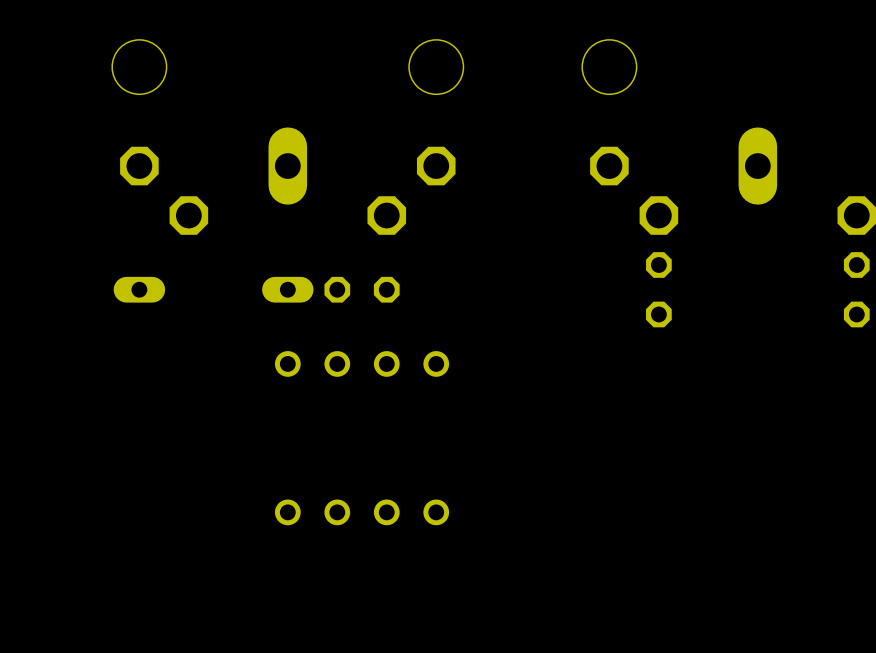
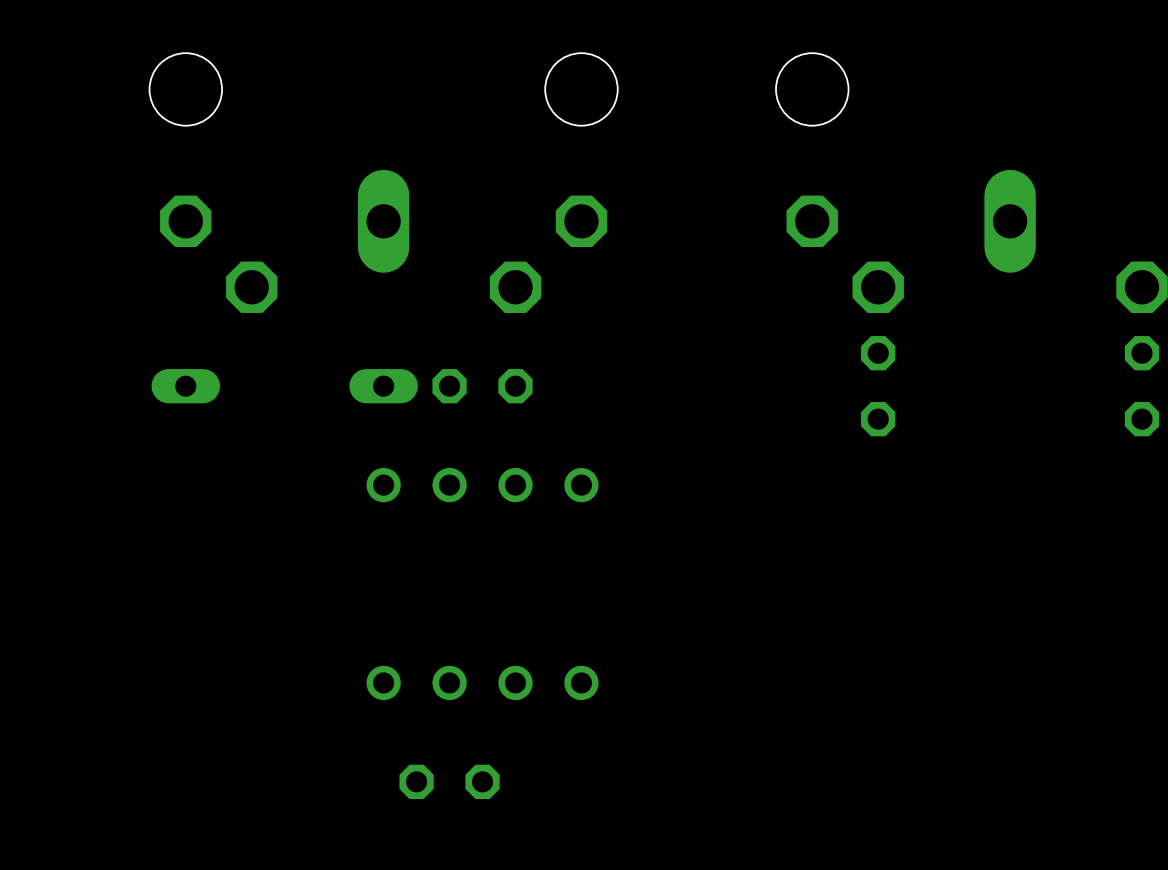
part: none -> (449, 781)

